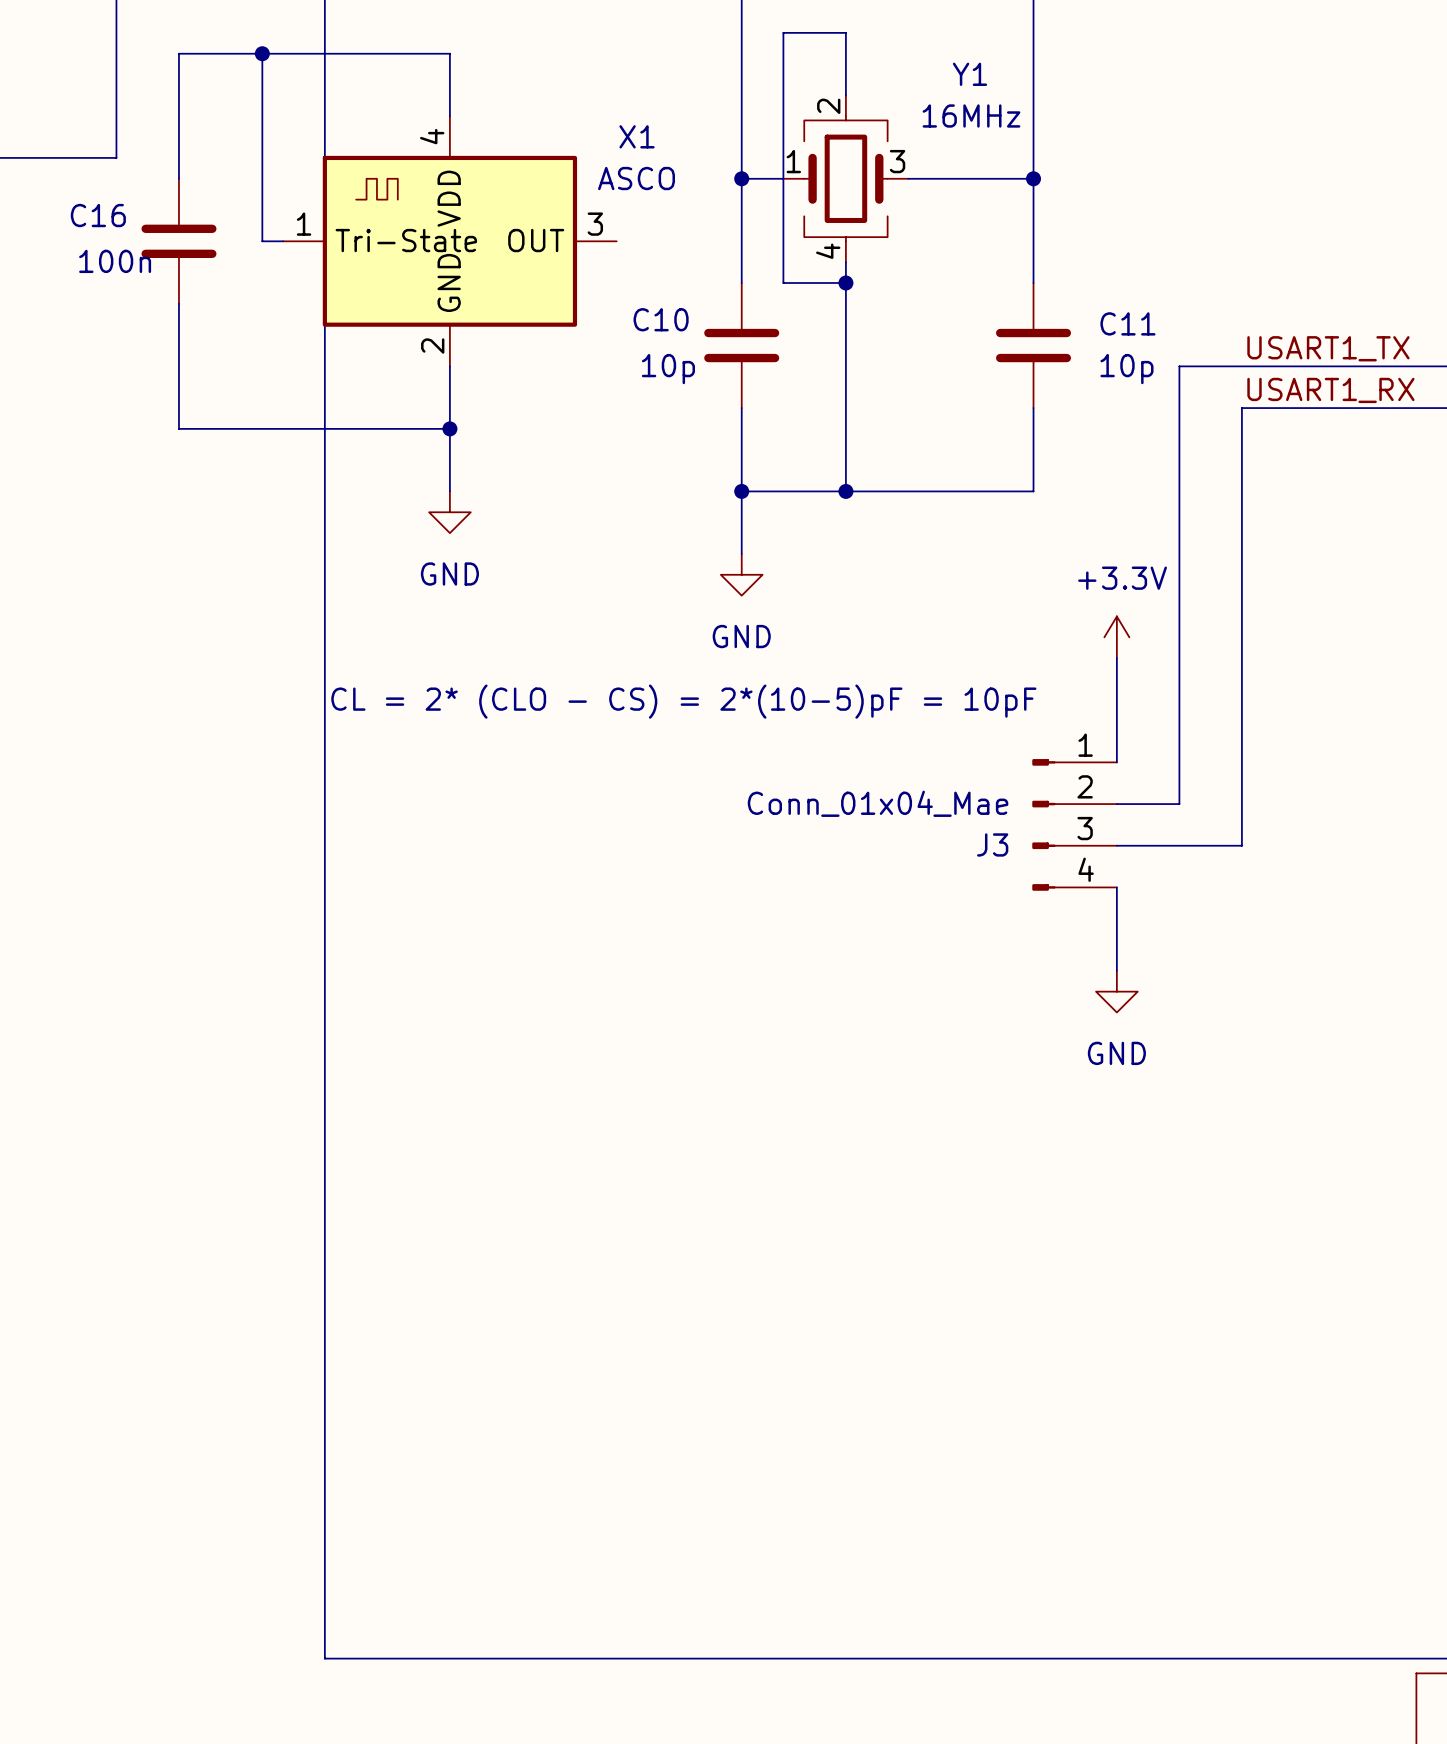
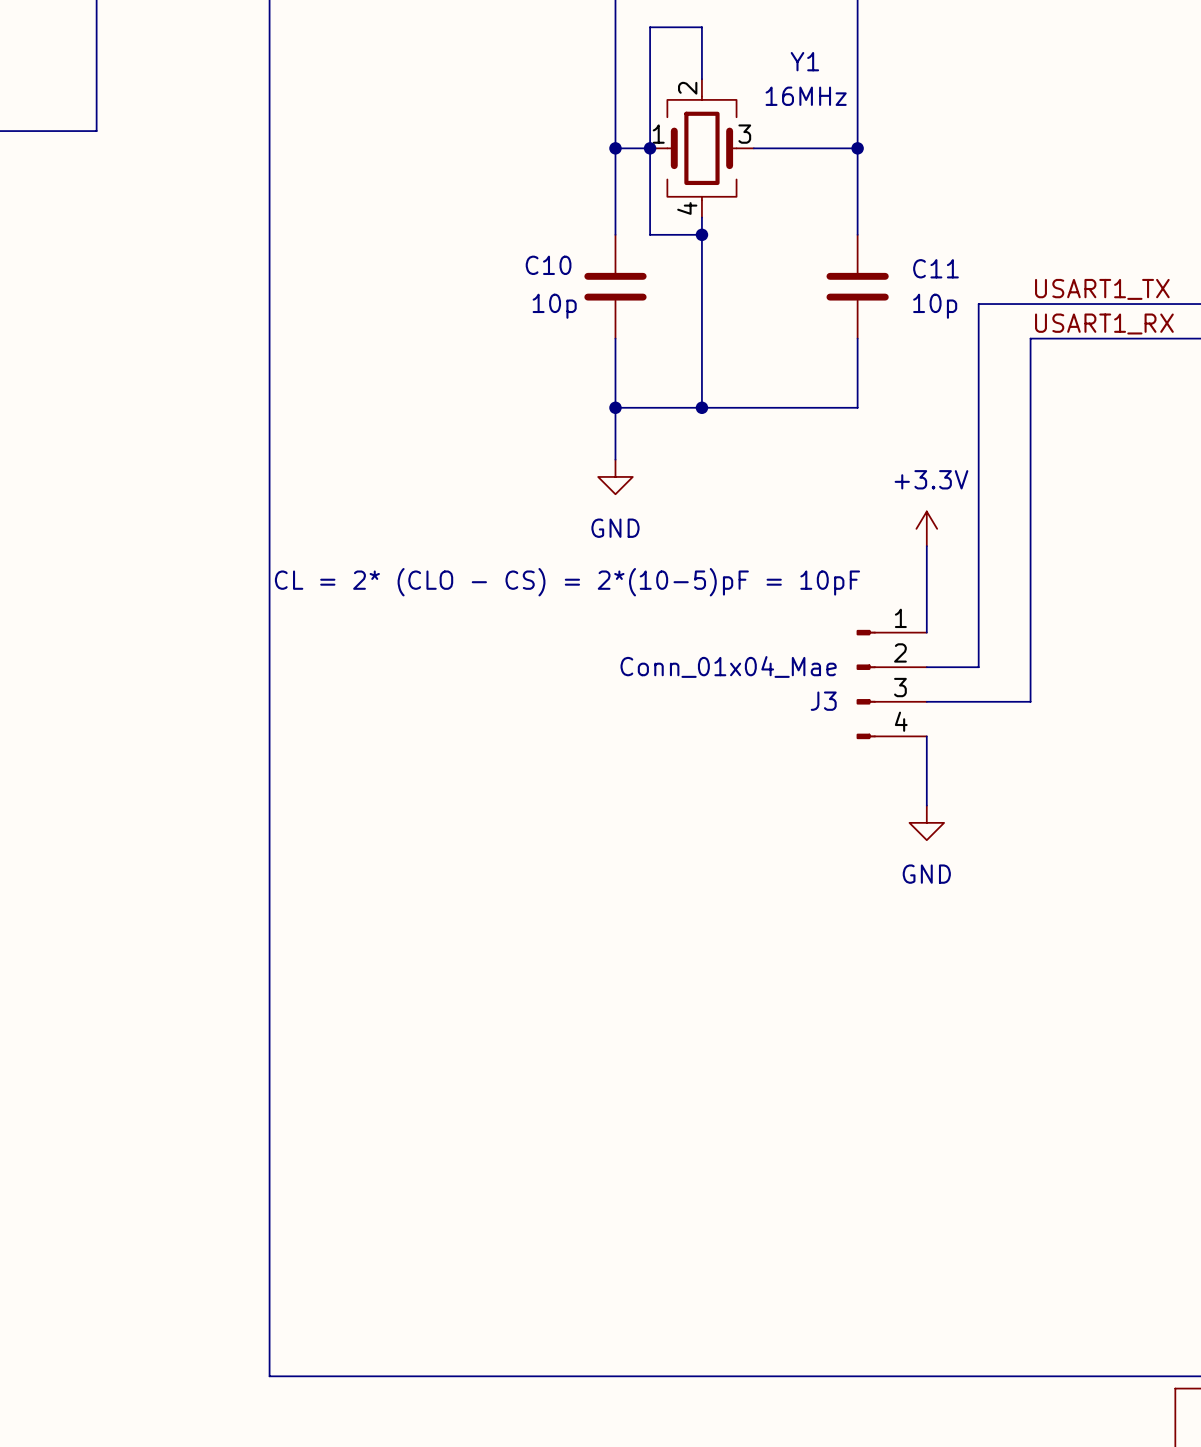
wire: (262, 53) (262, 241) (283, 241) -> none
junction: (262, 53) -> none
wire: (449, 116) (449, 53) (178, 53) (178, 178) -> none
junction: none -> (650, 148)
C16: 100n (178, 241) -> none
X1: ASCO (449, 241) -> none
wire: (178, 303) (178, 428) (449, 428) -> none
wire: (449, 366) (449, 491) -> none
junction: (449, 428) -> none
power symbol: GND (449, 512) -> none

